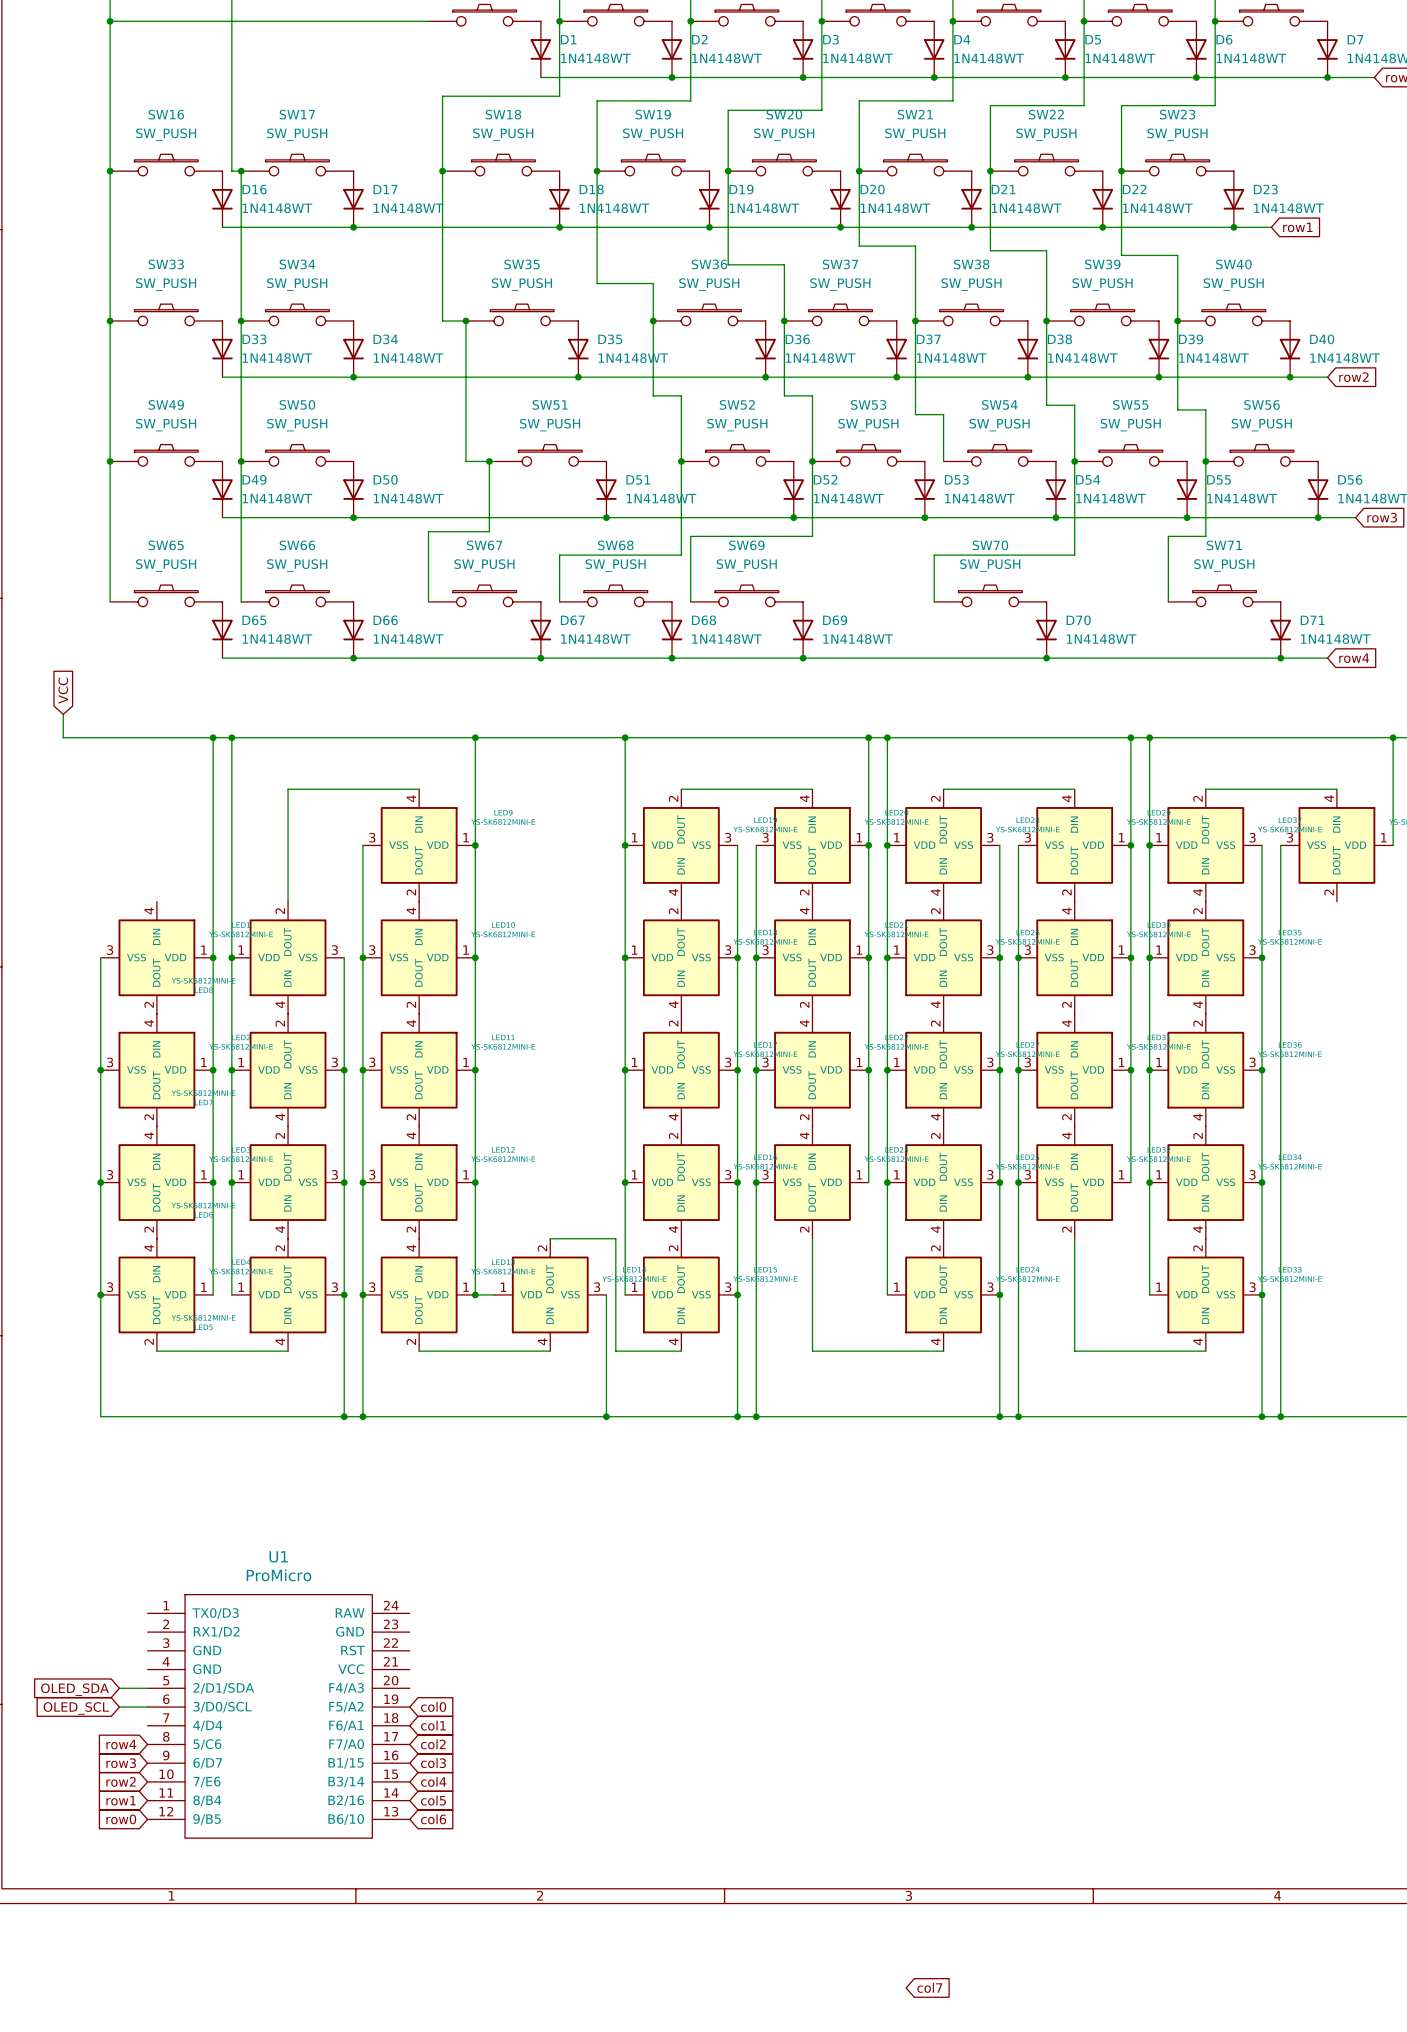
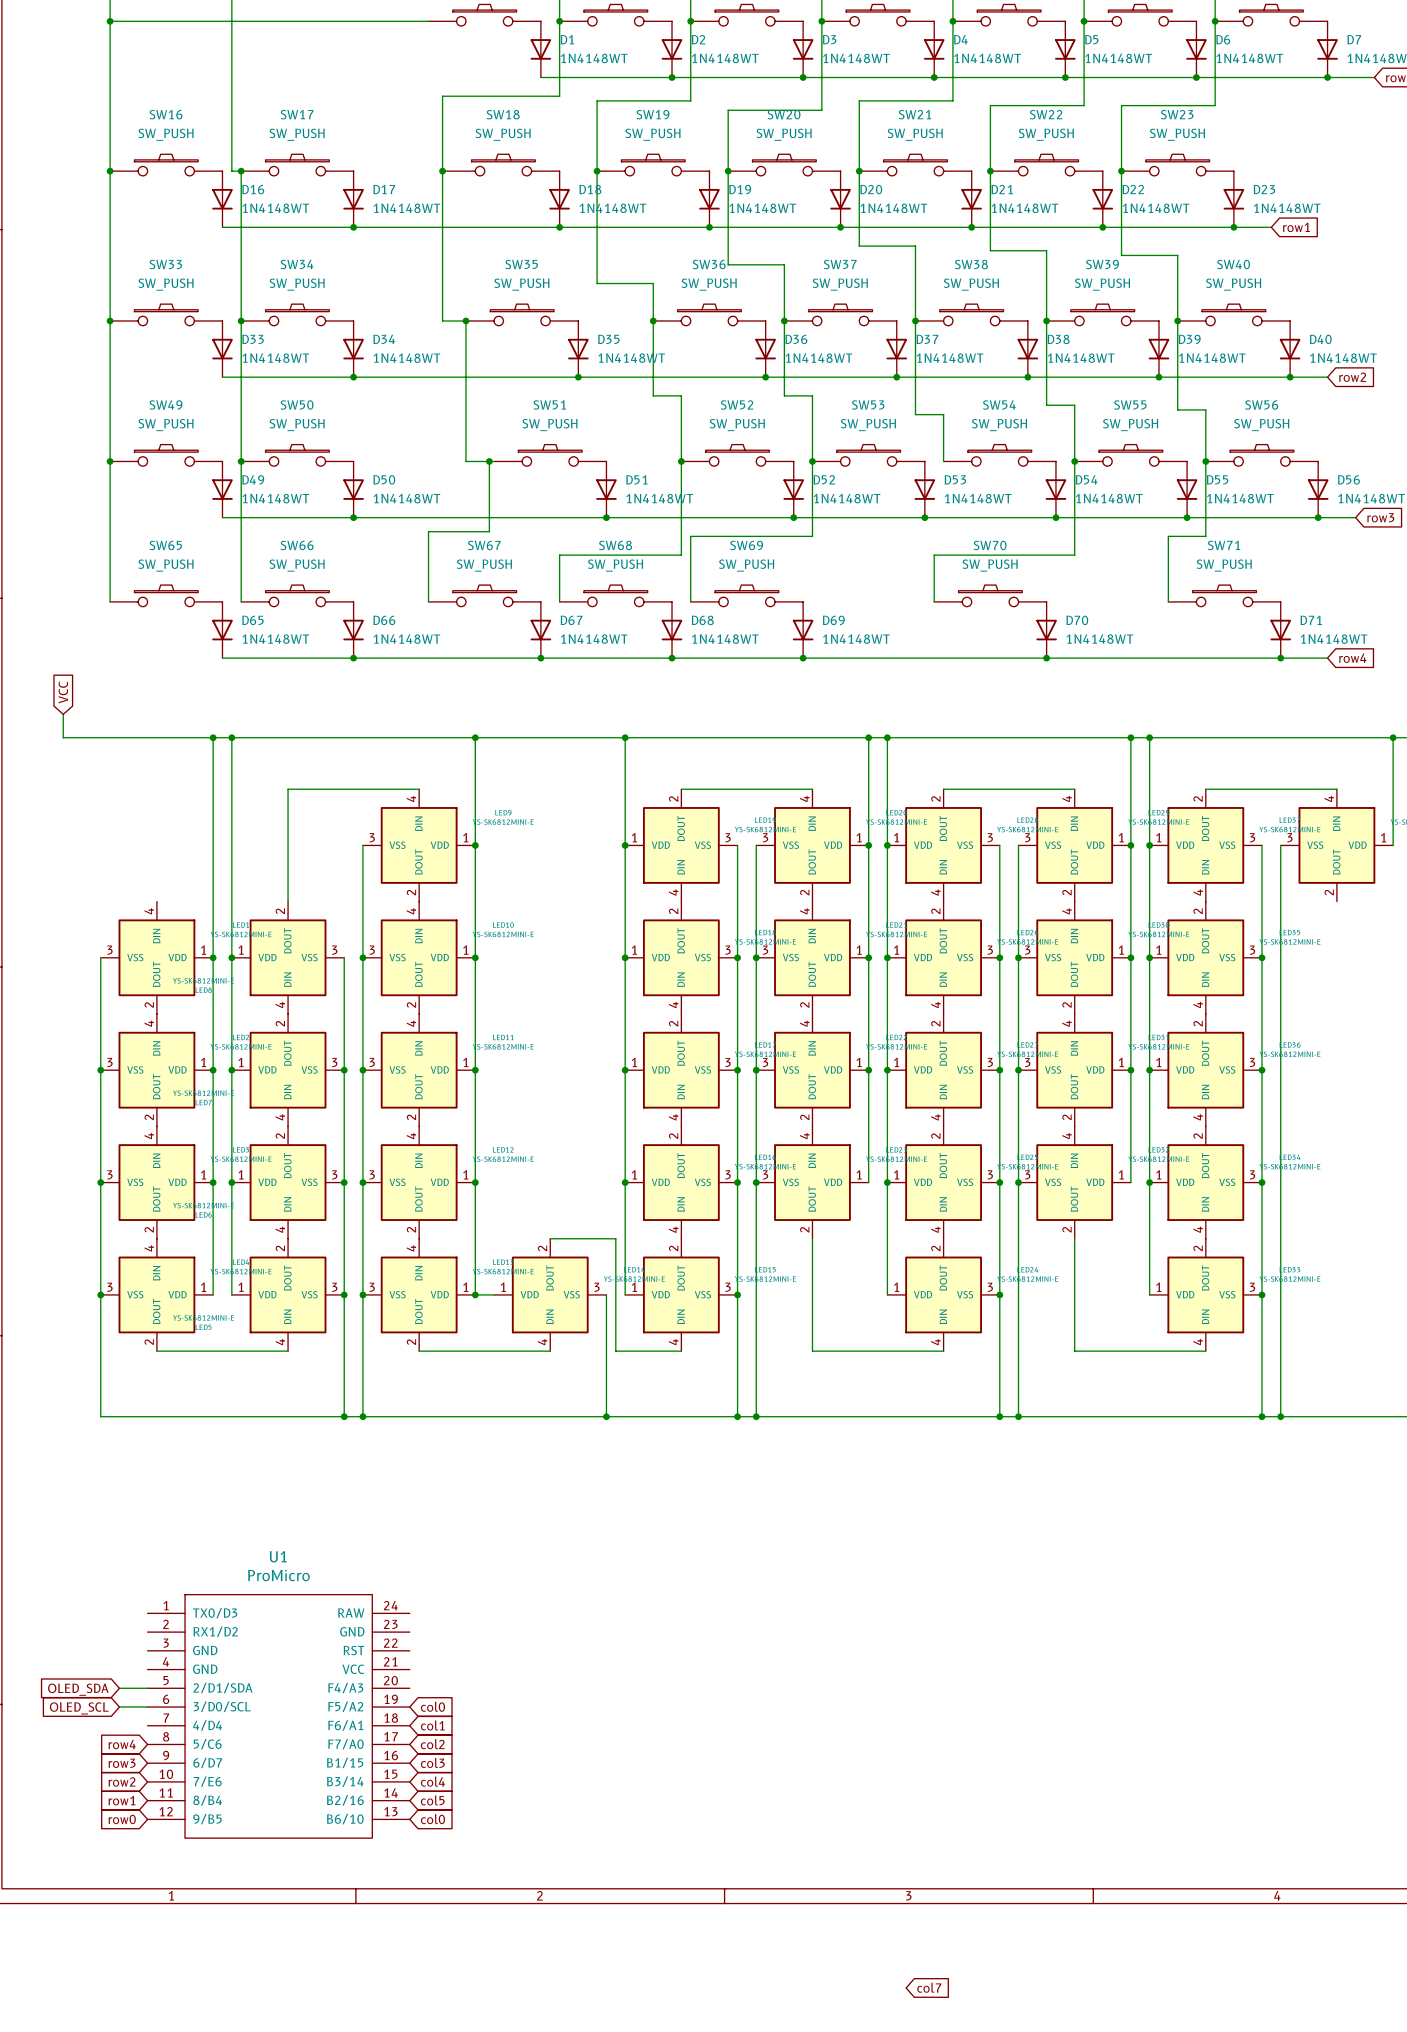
global label: col6 (433, 1819) -> col0 (432, 1819)

